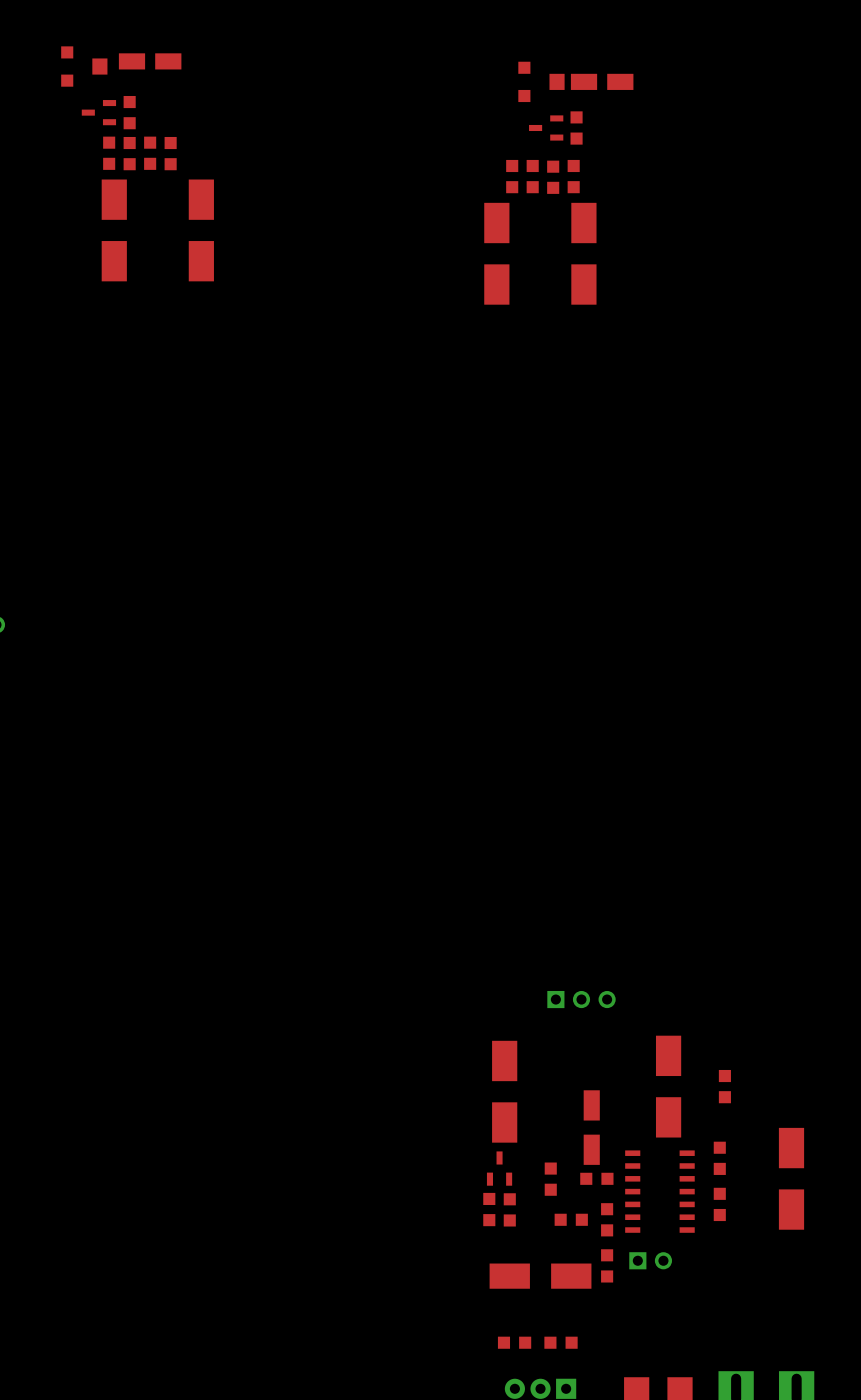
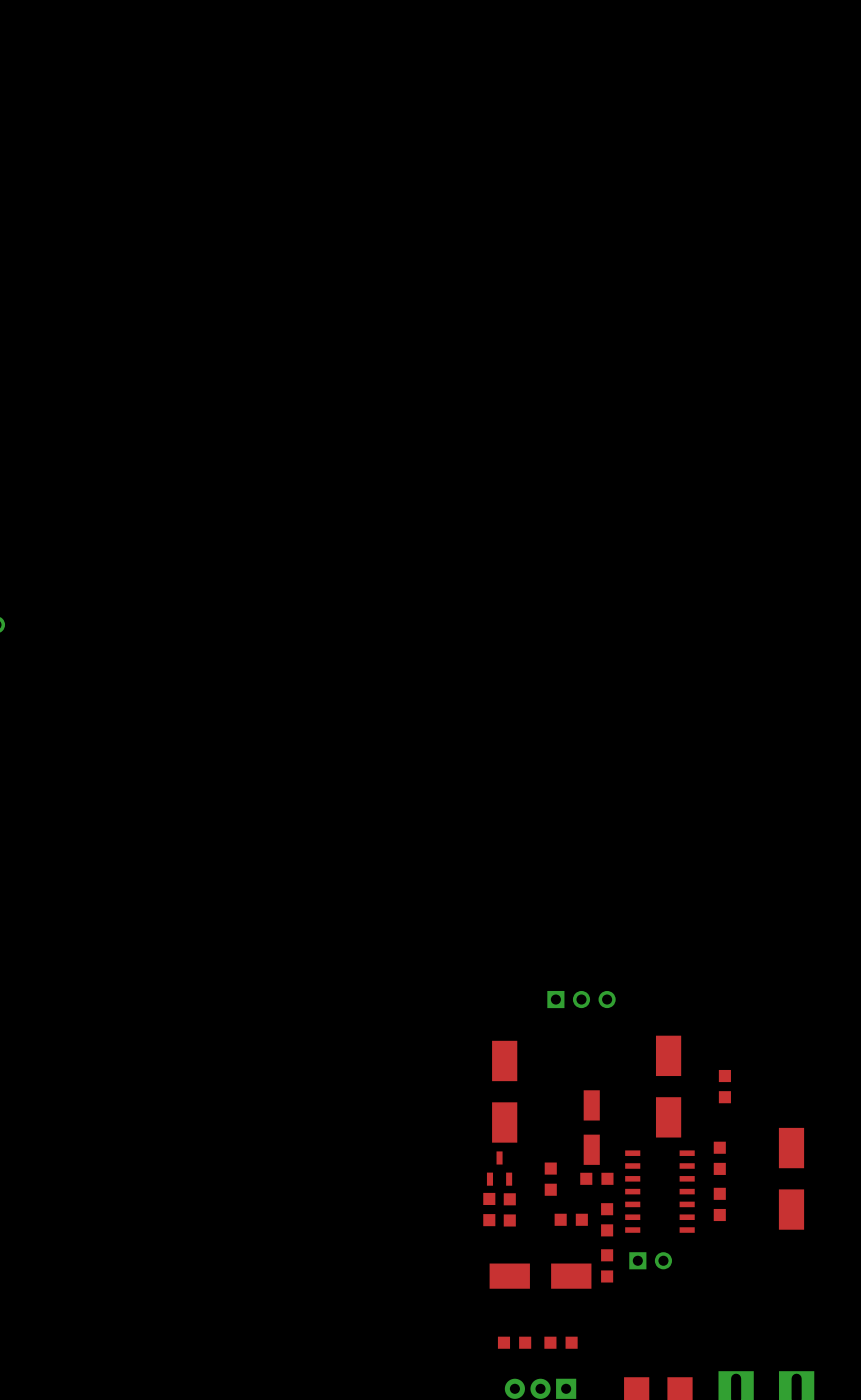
part: (150, 61) -> none
part: (84, 66) -> none
part: (541, 81) -> none
part: (602, 81) -> none
part: (98, 112) -> none
part: (129, 112) -> none
part: (546, 127) -> none
part: (576, 127) -> none
part: (109, 153) -> none
part: (129, 153) -> none
part: (150, 153) -> none
part: (170, 153) -> none
part: (512, 176) -> none
part: (532, 176) -> none
part: (573, 176) -> none
part: (553, 177) -> none
part: (114, 230) -> none
part: (201, 230) -> none
part: (496, 253) -> none
part: (583, 253) -> none

